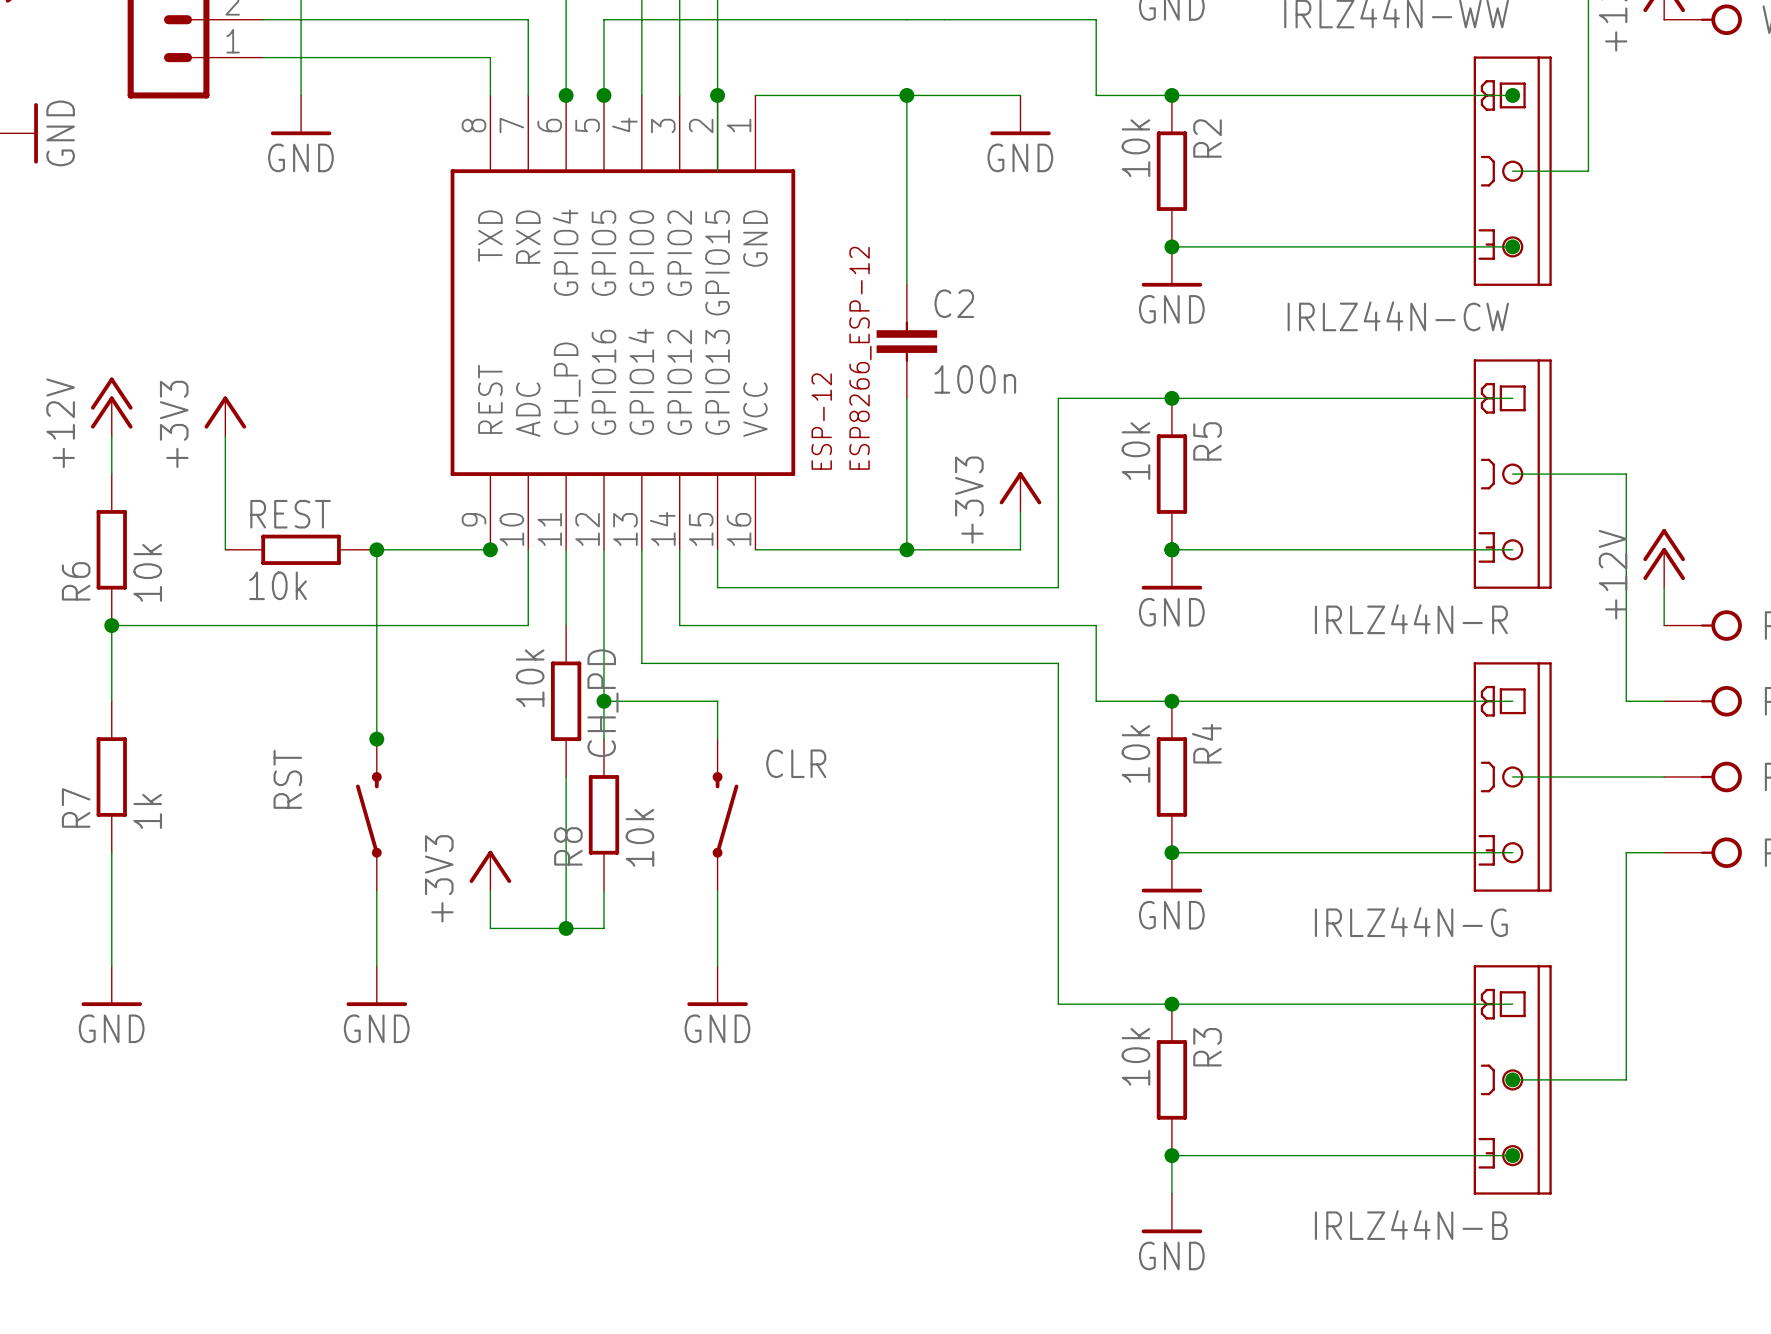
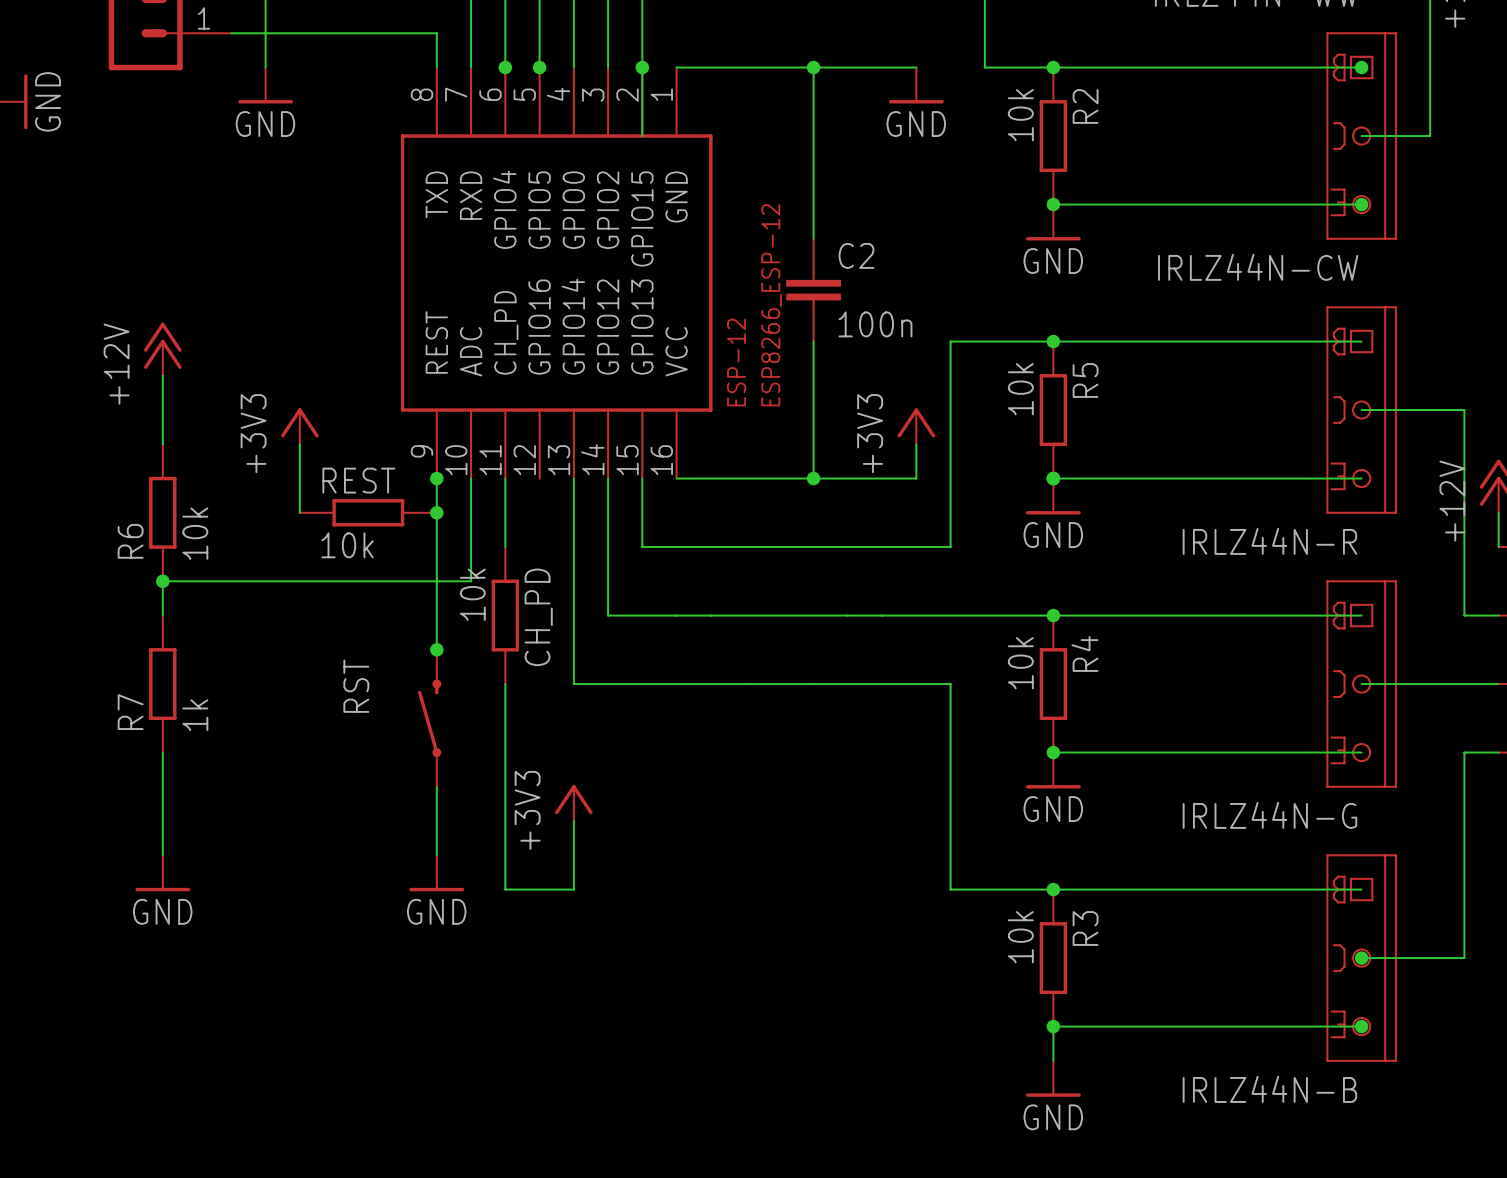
power symbol position: +12V (111, 406) -> +12V (162, 349)
power symbol position: +3V3 (225, 416) -> +3V3 (299, 426)
wire: (111, 436) (111, 474) -> none
wire: none -> (162, 375) (162, 444)
wire: (225, 436) (225, 549) -> none
wire: none -> (299, 444) (299, 512)
R6 position: (111, 549) -> (162, 512)
REST position: (301, 549) -> (368, 512)
junction: (376, 549) -> none
wire: (490, 549) (376, 549) (376, 739) -> (436, 478) (436, 649)
wire: (603, 549) (603, 739) -> none
junction: none -> (436, 512)
wire: (717, 587) (1058, 587) -> none
junction position: (111, 625) -> (162, 581)
wire: (528, 625) (111, 625) (111, 701) -> (471, 547) (471, 581) (162, 581) (162, 615)
wire: (679, 625) (717, 625) -> (642, 512) (642, 547)
wire: (1058, 625) (1096, 625) (1096, 701) -> (950, 547) (950, 512)
wire: (641, 663) (1058, 663) (1058, 776) -> (573, 581) (573, 684) (950, 684)
wire: (603, 701) (679, 701) -> (608, 547) (608, 615)
junction: (603, 701) -> none
wire: (717, 701) (717, 739) -> (642, 615) (984, 615)
junction: (376, 739) -> none
junction: none -> (436, 649)
R7 position: (111, 776) -> (162, 684)
RST position: (368, 814) -> (429, 718)
R8: 10k (603, 814) -> none
CLR: (725, 814) -> none
wire: (111, 852) (111, 966) -> (162, 752) (162, 855)
power symbol position: +3V3 (490, 870) -> +3V3 (573, 803)
wire: (376, 890) (376, 966) -> none
wire: (603, 890) (603, 928) (490, 928) -> (436, 855) (436, 821)
wire: (717, 890) (717, 966) -> none
wire: none -> (505, 821) (505, 889) (573, 889) (573, 821)
junction: (566, 928) -> none
power symbol position: GND (111, 986) -> GND (162, 873)
power symbol: GND (376, 986) -> none
power symbol: none -> GND (436, 873)
power symbol: GND (717, 986) -> none

